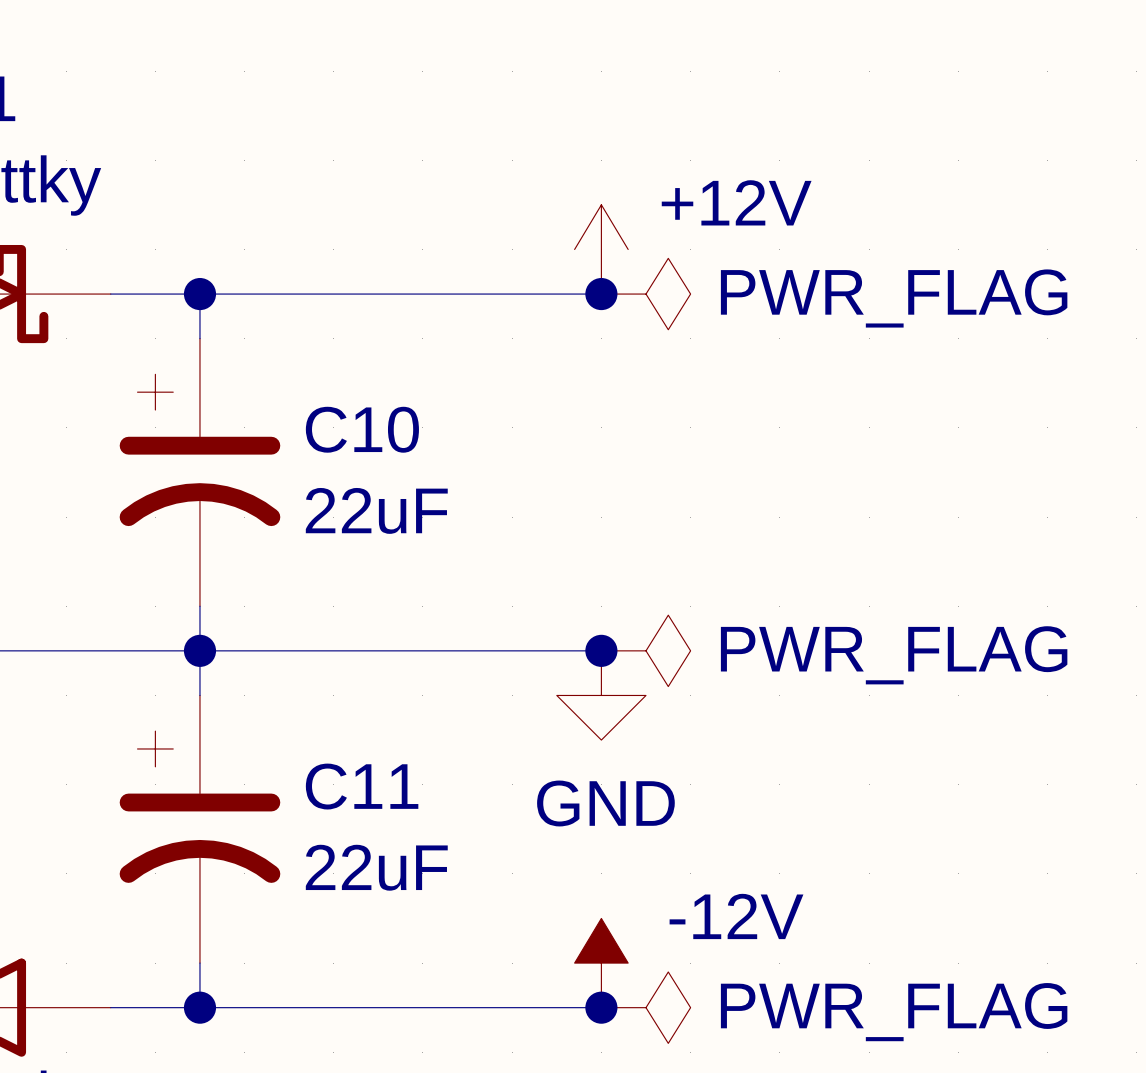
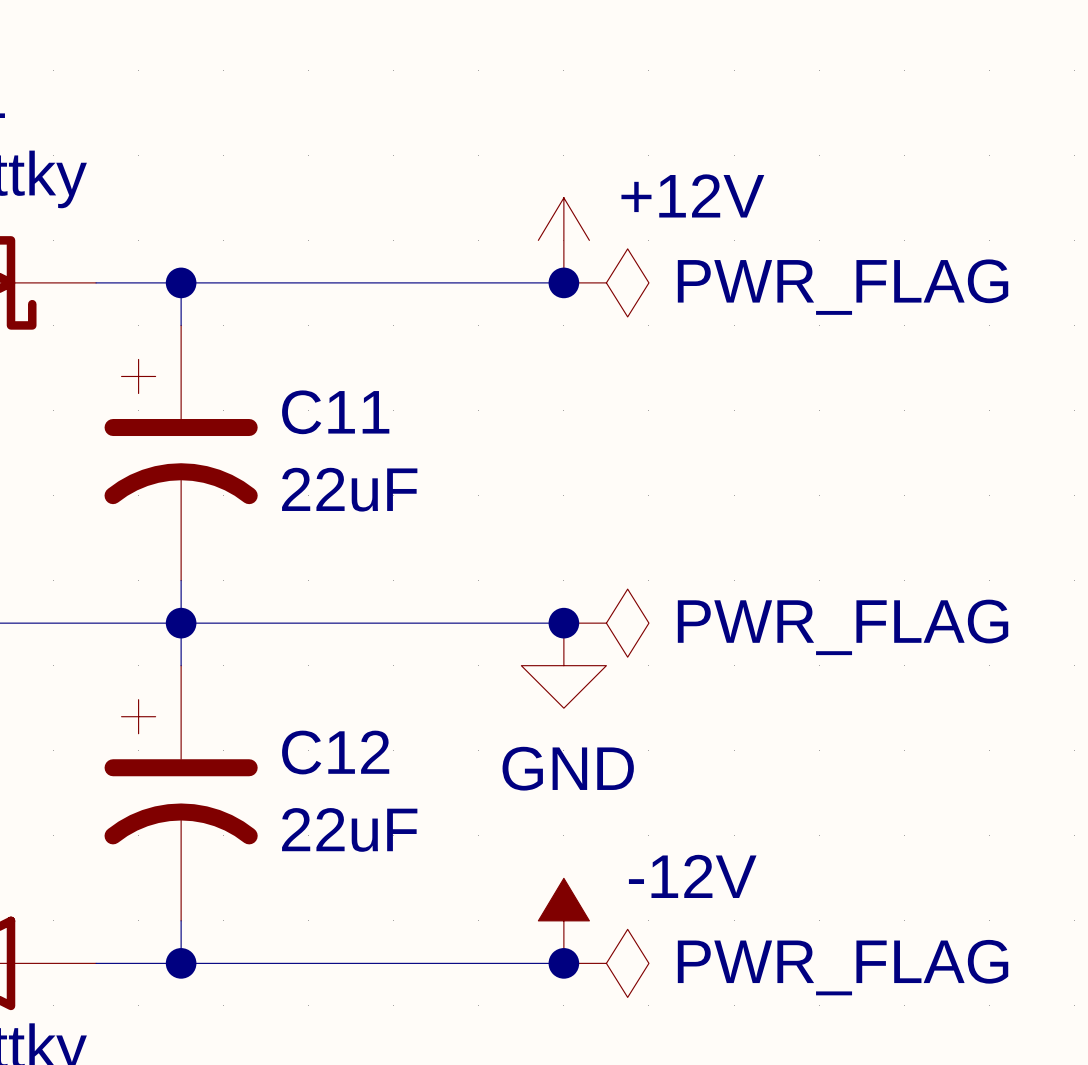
C10 name: C10 (362, 429) -> C11 (335, 412)
C11 name: C11 (362, 786) -> C12 (335, 752)

